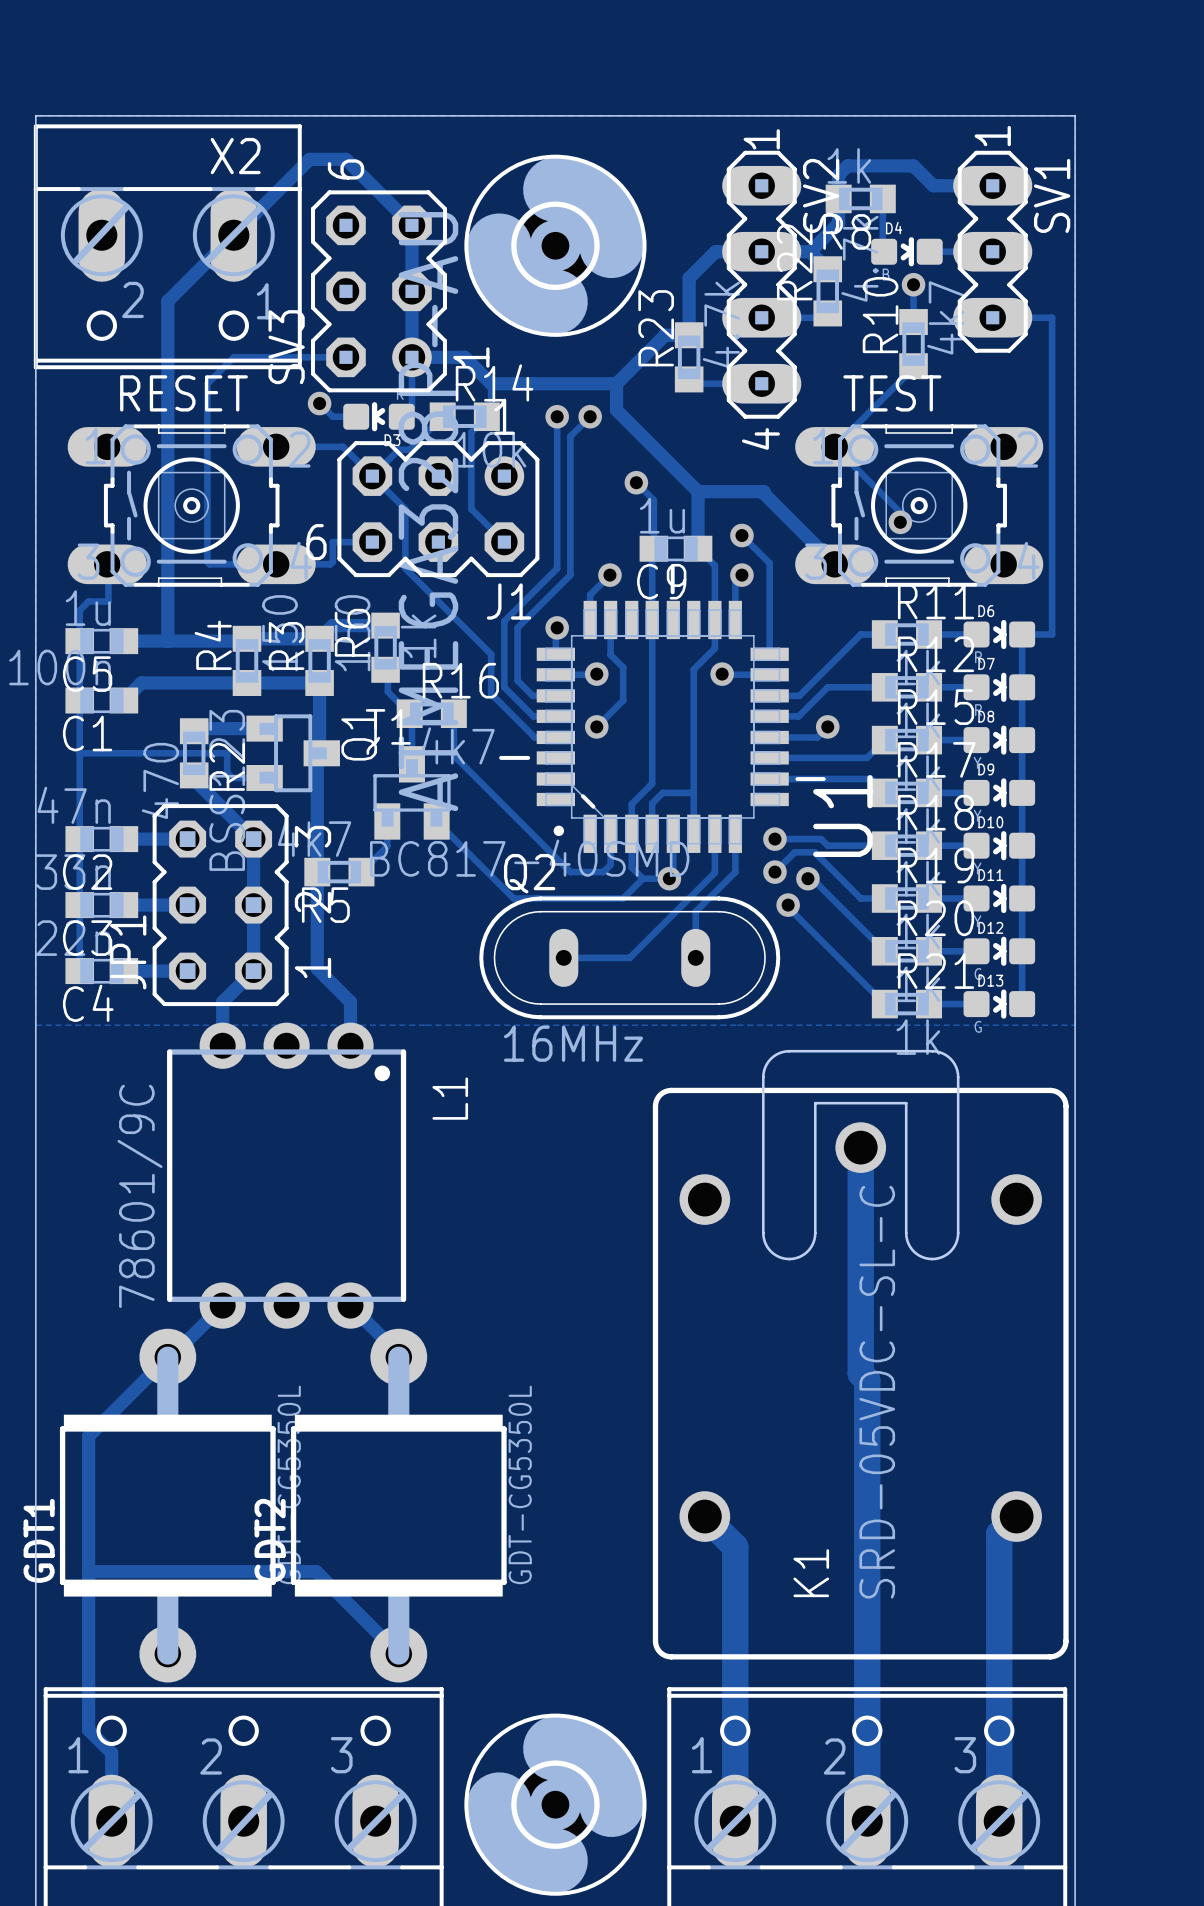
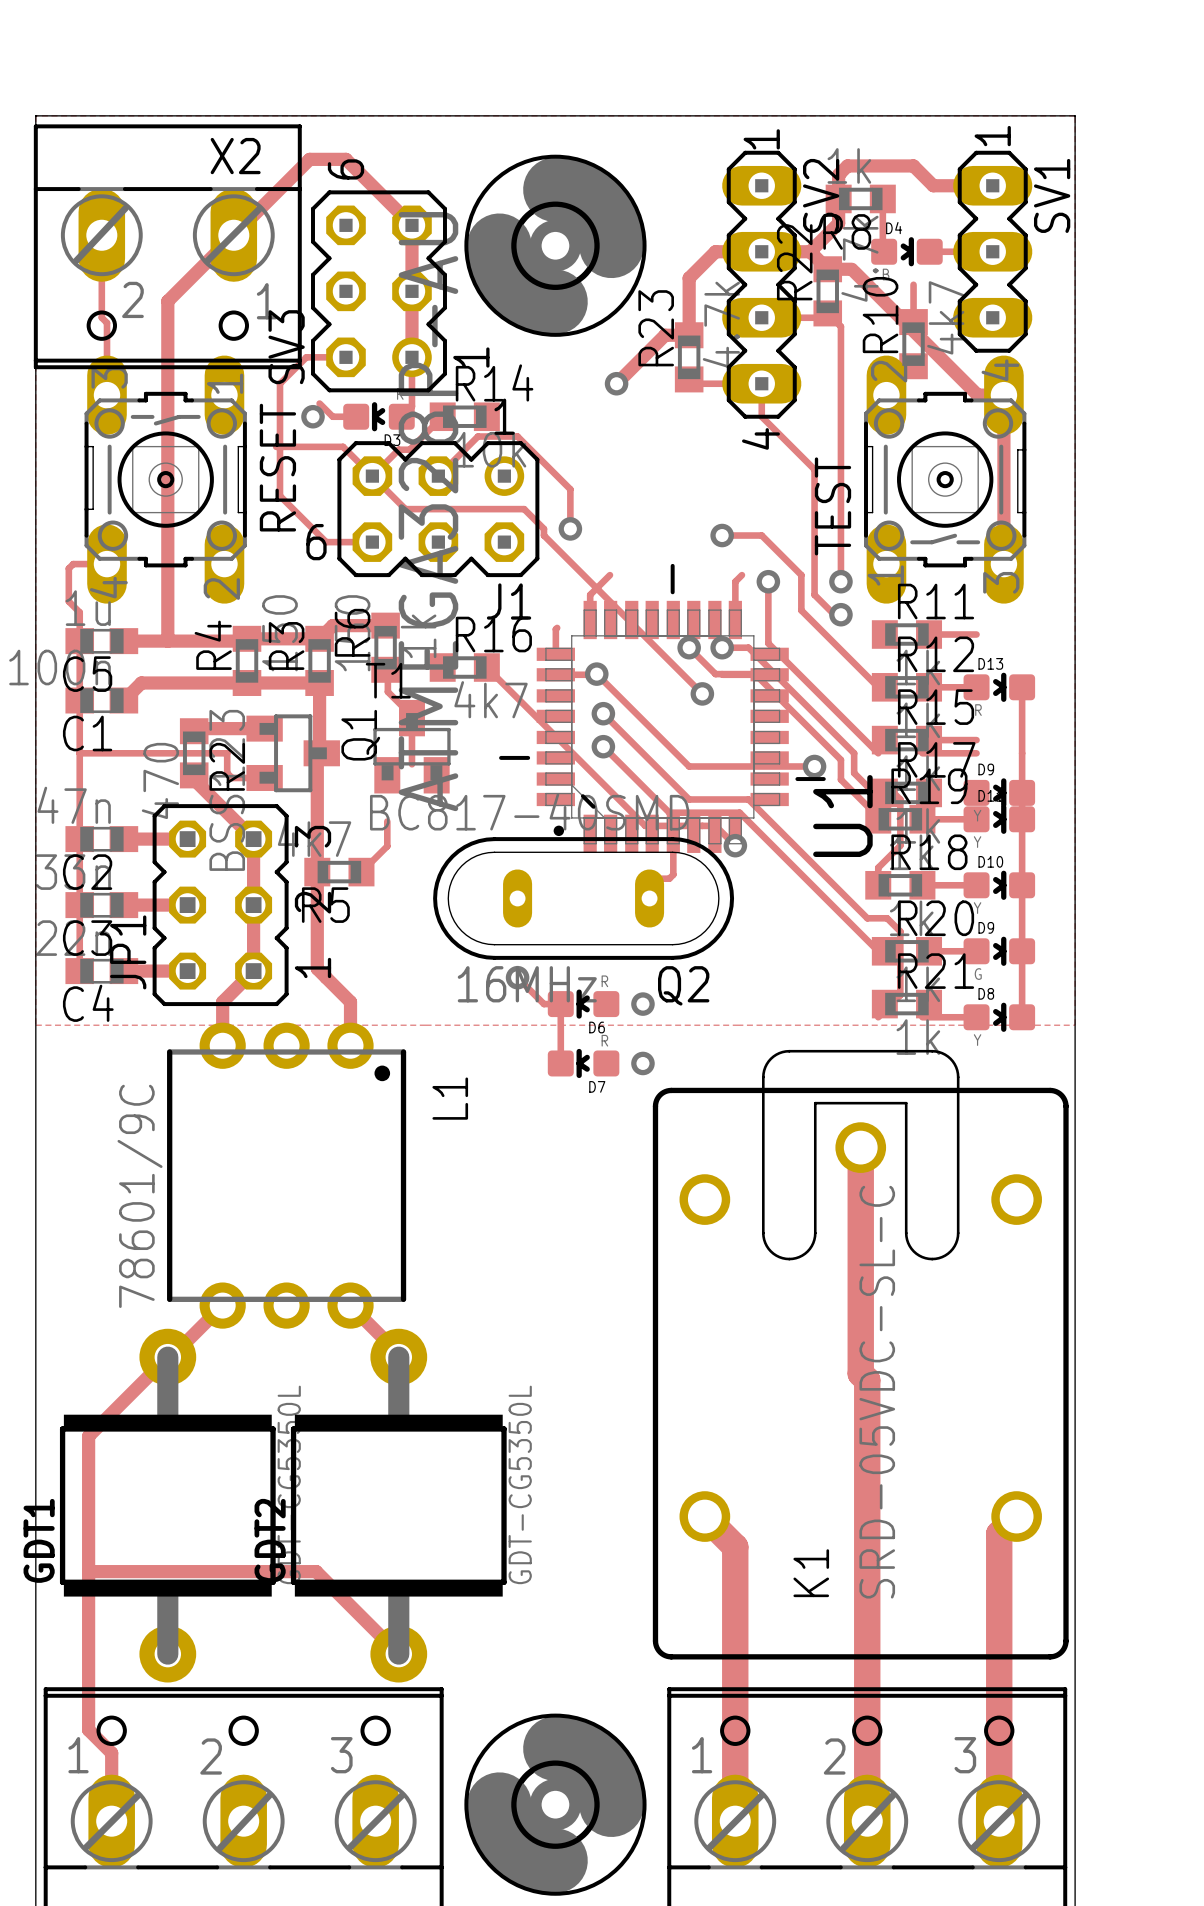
track: none -> (101, 235) (101, 317) (106, 322) (106, 395)
track: none -> (827, 269) (851, 269) (977, 395) (1003, 395) (1003, 566) (1005, 568)
via: (913, 284) -> none
track: none -> (827, 313) (840, 326) (840, 581)
track: (992, 317) (1052, 317) (1052, 634) (1022, 634) (1022, 687) -> none
track: (306, 357) (233, 357) (207, 383) (207, 561) (209, 564) (330, 564) (332, 561) (332, 542) -> (306, 357) (280, 383) (280, 495) (326, 542) (332, 542)
track: (411, 357) (464, 357) (491, 383) -> none
track: (913, 366) (834, 446) (900, 512) (900, 522) -> none
track: (491, 383) (616, 383) (616, 410) (698, 491) -> none
track: (491, 383) (491, 414) (471, 432) (471, 509) (504, 542) -> none
via: none -> (616, 383)
track: none -> (761, 383) (761, 416) (814, 469) (814, 594) (834, 614) (840, 614)
via position: (319, 403) -> (312, 416)
track: (557, 416) (557, 568) (504, 621) (504, 687) (533, 716) (555, 716) -> none
via: (557, 416) -> none
track: (590, 416) (570, 436) (570, 489) -> (438, 476) (477, 436) (517, 436) (570, 489)
via: (590, 416) -> none
RESET: none -> (165, 479)
track: (636, 482) (653, 500) (652, 783) (631, 804) (631, 867) (642, 878) (623, 898) (513, 898) (436, 821) -> none
via: (636, 482) -> none
track: (698, 491) (698, 548) (714, 565) (714, 648) (693, 669) (693, 833) -> none
track: (698, 491) (764, 491) (834, 564) -> none
RESET: (191, 505) -> none
TEST rotation: 0° (919, 505) -> 90° counterclockwise (945, 479)
track: (405, 509) (405, 568) (491, 654) (491, 693) (534, 737) (555, 737) -> (405, 509) (524, 509) (543, 528) (543, 535) (702, 693)
via: (900, 522) -> none
track: (570, 528) (570, 575) (517, 627) (517, 680) (532, 695) (555, 695) -> none
via: none -> (570, 528)
track: none -> (722, 535) (761, 535) (801, 575) (801, 610) (878, 687)
track: (741, 535) (769, 563) (769, 654) -> none
via position: (741, 535) -> (722, 535)
C9: 1u (675, 548) -> none
track: (107, 564) (108, 601) (88, 601) (79, 612) -> (106, 564) (73, 564) (68, 568) (68, 601) (79, 612)
via: (609, 575) -> none
via: (741, 575) -> none
track: none -> (768, 581) (768, 643) (878, 753)
via: none -> (768, 581)
via: none -> (840, 581)
via: none -> (840, 614)
track: (610, 619) (610, 654) (623, 667) (623, 700) (596, 726) -> none
via: (557, 627) -> none
track: (884, 634) (860, 634) (799, 695) (769, 695) -> none
D6 rotation: 0° (999, 634) -> 180° (583, 1004)
D6 position: (999, 634) -> (583, 1004)
track: none -> (689, 647) (715, 674) (755, 674) (840, 759) (840, 779) (878, 817) (878, 819)
via: none -> (689, 647)
track: none -> (722, 647) (748, 647) (854, 753) (854, 773) (867, 786) (887, 786) (900, 799) (900, 845) (878, 867) (878, 885)
via: none -> (722, 647)
D7 name: D7 (986, 663) -> D13 (990, 663)
track: none -> (486, 667) (645, 825) (715, 825) (735, 845)
via: (722, 674) -> none
track: none -> (603, 680) (689, 766) (814, 766)
track: (884, 687) (827, 687) (798, 716) (769, 716) -> none
via: none -> (702, 693)
R16 position: (431, 713) -> (464, 667)
track: (453, 713) (453, 755) (570, 872) (603, 872) (610, 864) (610, 833) -> none
track: none -> (603, 713) (689, 799) (748, 799) (867, 918) (887, 918) (900, 931) (900, 995) (878, 1017)
via: none -> (603, 713)
via: (596, 726) -> none
track: (827, 726) (817, 737) (769, 737) -> none
via: (827, 726) -> none
track: (884, 740) (867, 757) (769, 757) -> none
D8 position: (999, 740) -> (999, 1017)
track: none -> (603, 746) (669, 812) (739, 812) (878, 951)
via: none -> (603, 746)
track: none -> (922, 753) (976, 753)
via: none -> (814, 766)
track: (769, 779) (871, 779) (884, 792) -> none
T1 position: (411, 792) -> (411, 746)
track: (693, 792) (662, 792) (652, 803) (652, 833) -> none
track: (929, 792) (976, 792) -> none
track: none -> (922, 819) (976, 819)
track: (714, 833) (714, 872) (629, 957) (563, 957) -> none
track: (735, 833) (735, 872) (695, 911) (695, 957) -> none
track: (774, 839) (821, 839) (827, 845) (884, 845) -> none
via: (774, 839) -> none
via: none -> (735, 845)
R18 position: (906, 845) -> (900, 885)
track: (929, 845) (976, 845) -> none
D10 position: (999, 845) -> (999, 885)
track: (774, 872) (794, 852) (814, 852) (860, 898) (884, 898) -> none
via: (774, 872) -> none
Q2 name position: Q2 (529, 873) -> Q2 (683, 985)
via: (669, 878) -> none
track: (807, 878) (812, 878) (884, 951) -> none
via: (807, 878) -> none
track: none -> (922, 885) (976, 885)
R19 position: (906, 898) -> (900, 819)
track: (929, 898) (976, 898) -> none
D11 position: (999, 898) -> (999, 819)
track: (788, 905) (788, 907) (884, 1004) -> none
via: (788, 905) -> none
D12 name: D12 (990, 927) -> D9 (986, 927)
Q2 position: (629, 957) -> (583, 898)
track: none -> (517, 977) (543, 1004) (560, 1004) (560, 1063)
via: none -> (517, 977)
via: none -> (642, 1004)
track: (929, 1004) (976, 1004) -> none
D13: G (999, 1004) -> none
track: none -> (922, 1017) (976, 1017)
D7: none -> R (583, 1063)
via: none -> (642, 1063)

